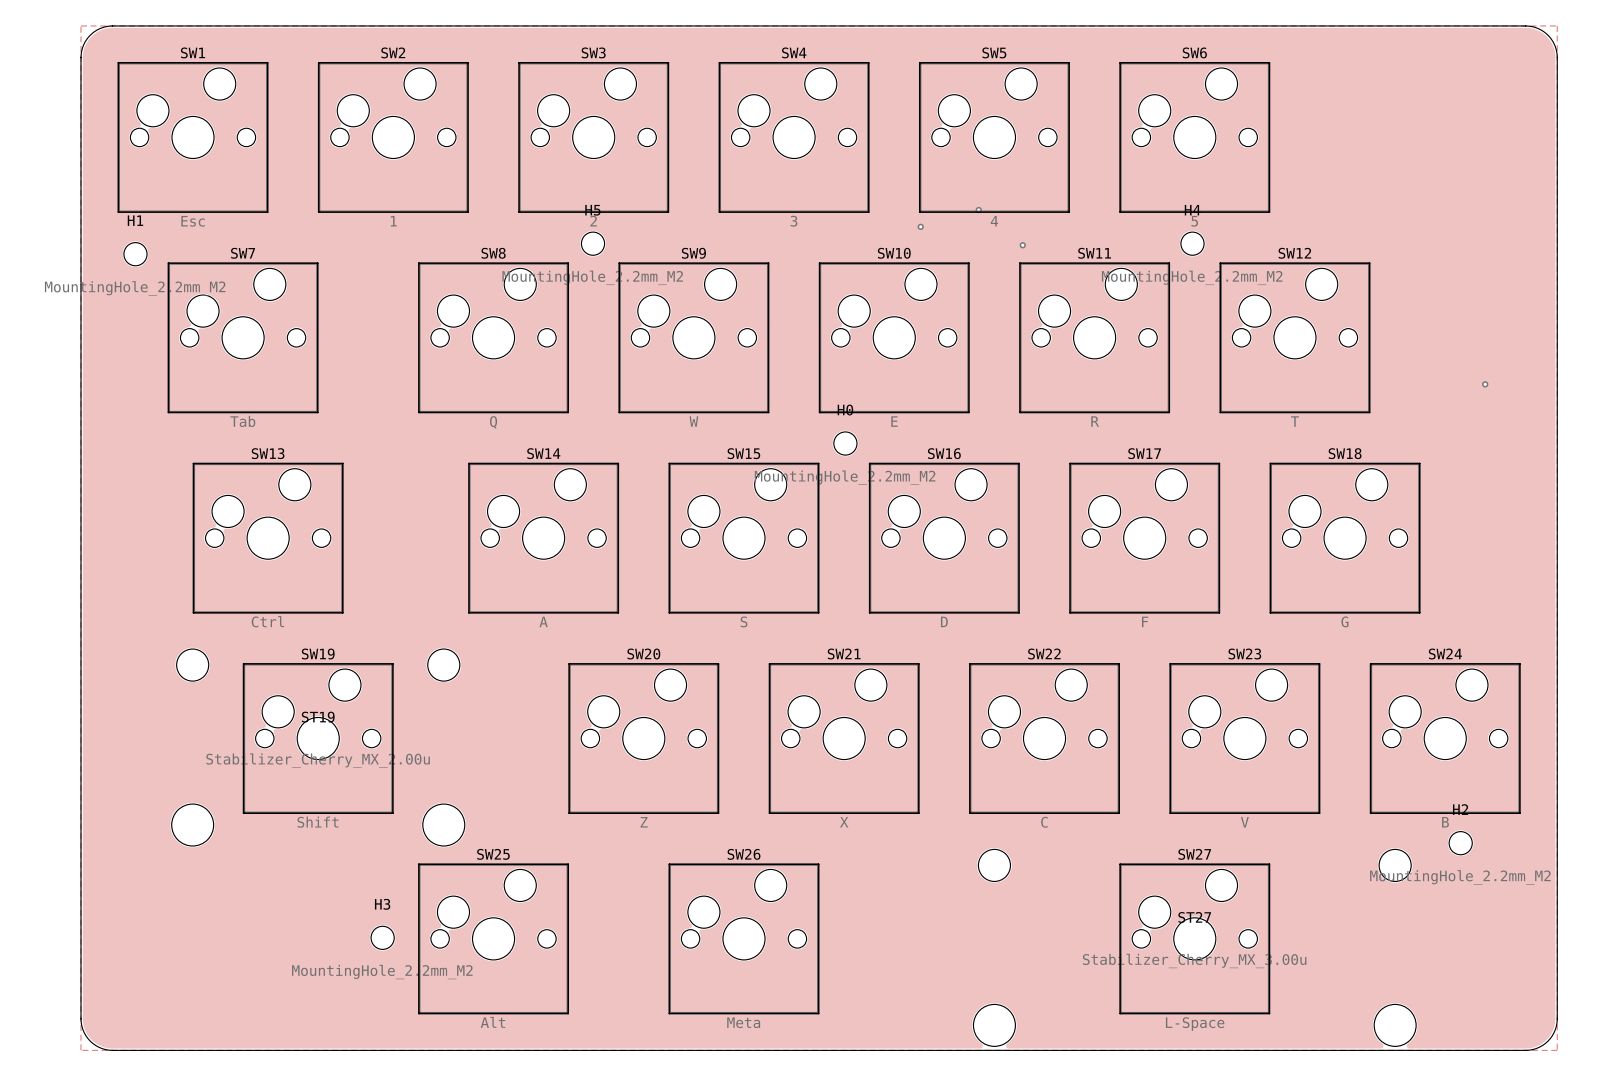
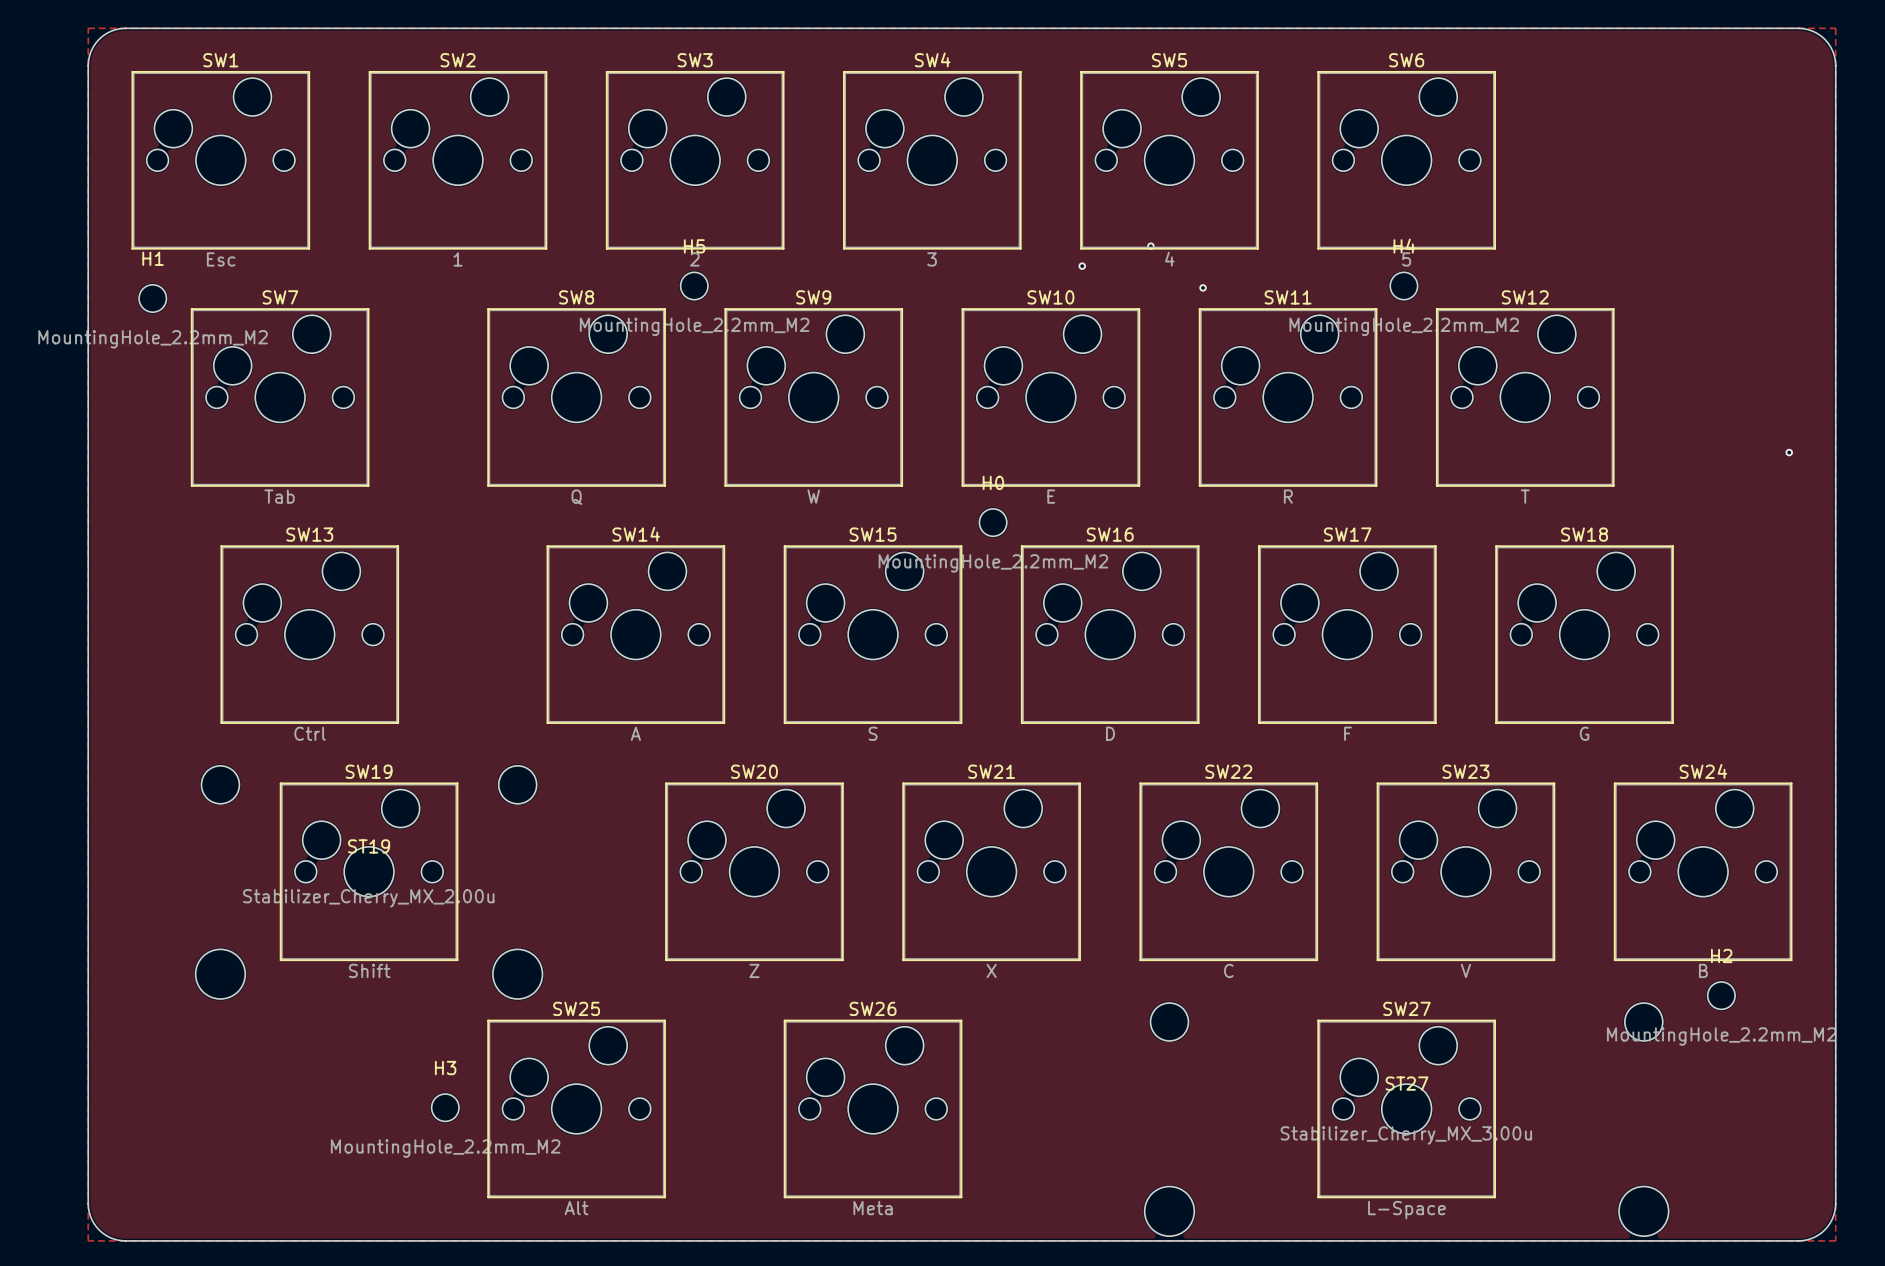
via position: (1485, 384) -> (1789, 452)

